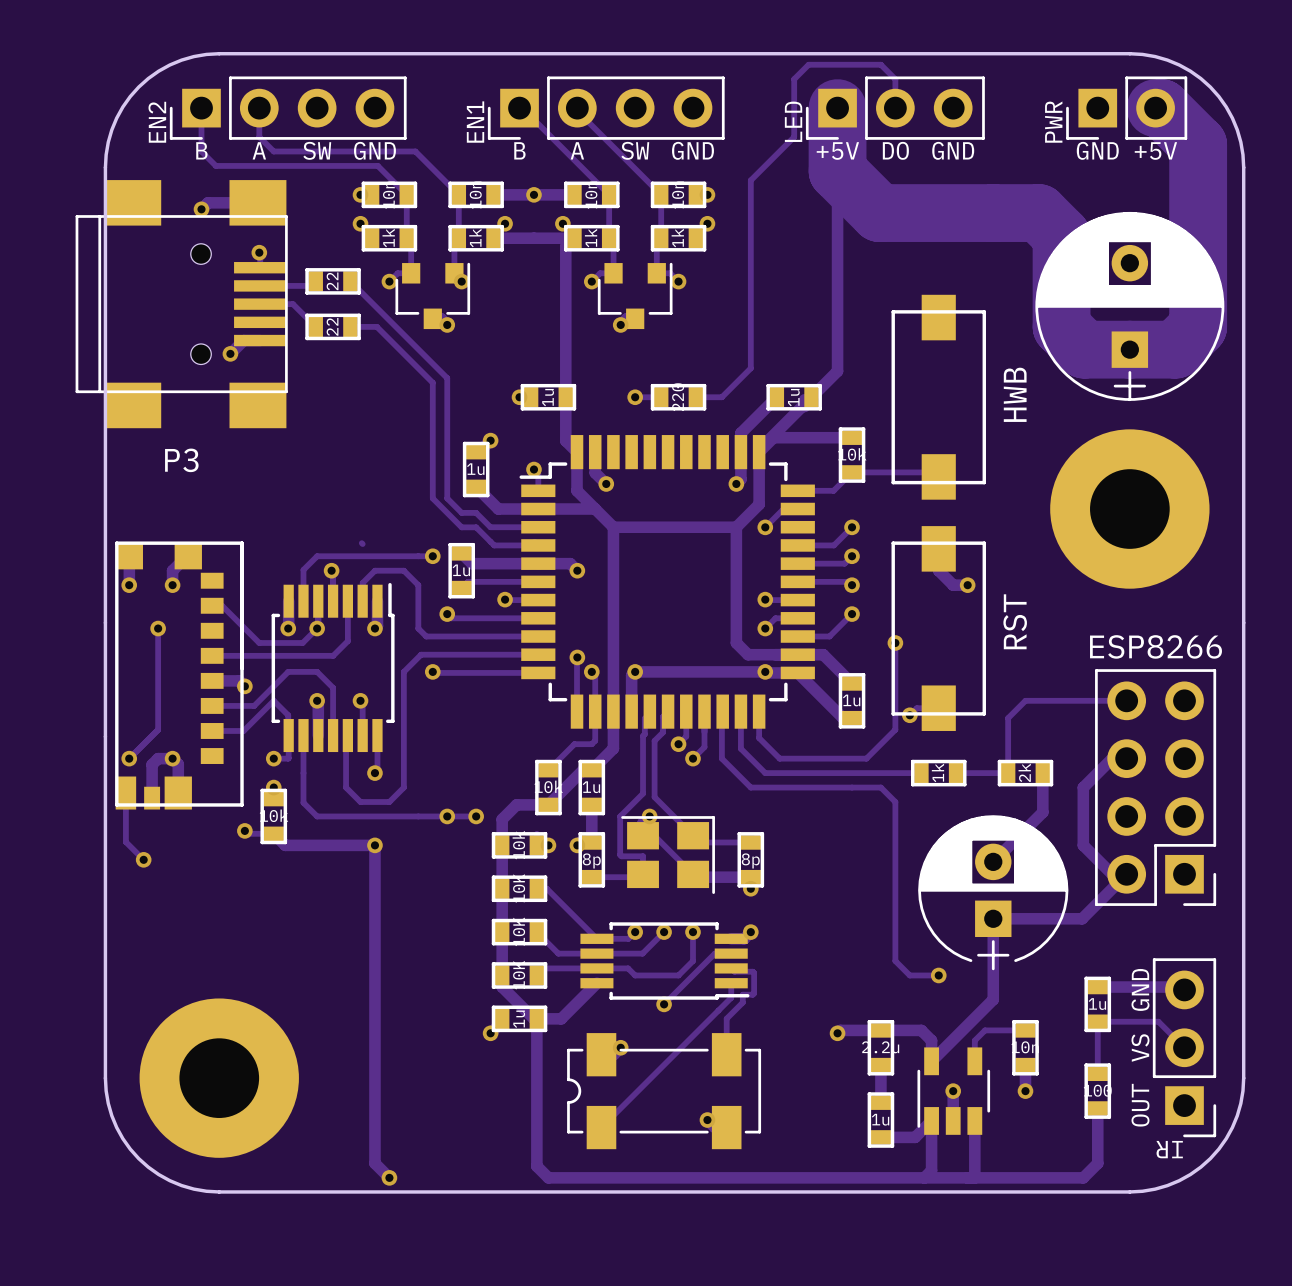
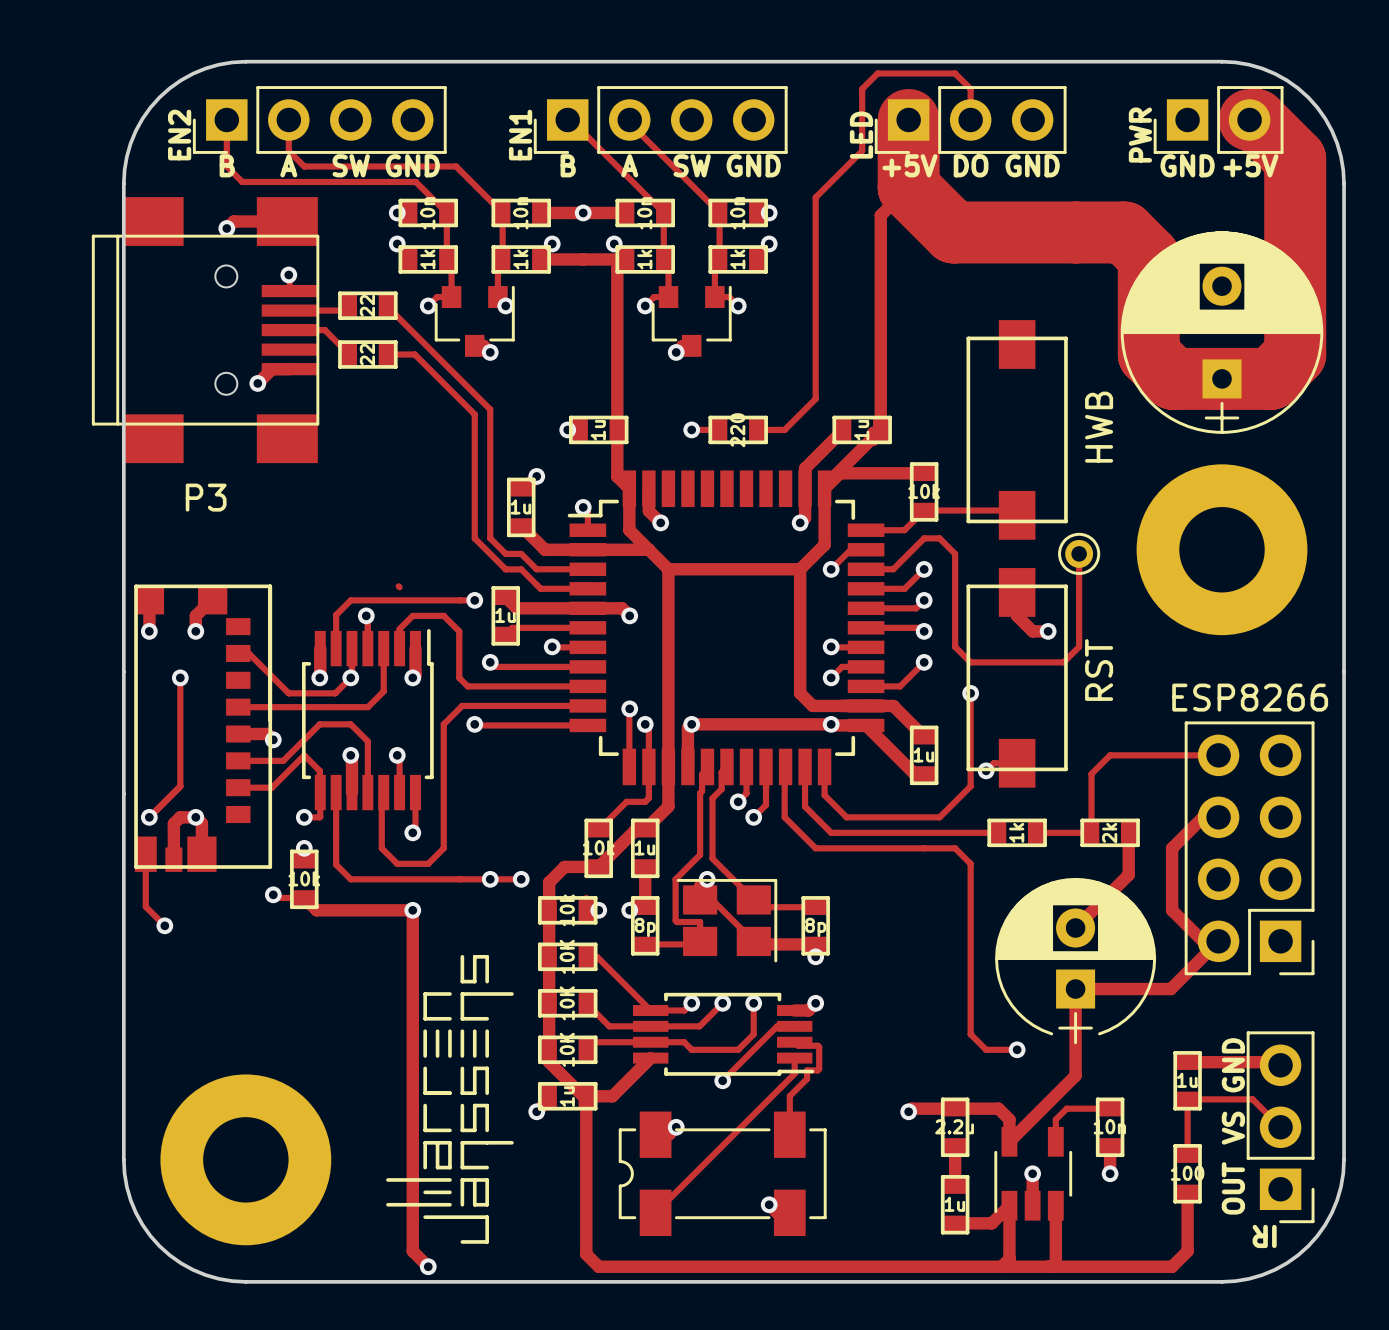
track: (837, 108) (837, 371) (811, 397) -> (908, 187) (880, 215) (880, 429)
track: none -> (1079, 553) (1079, 646) (1063, 662) (970, 662) (955, 646) (955, 553) (939, 538) (924, 538) (893, 569) (866, 569)
part: none -> (1079, 553)
drawing: none -> [386, 954, 514, 1244]

